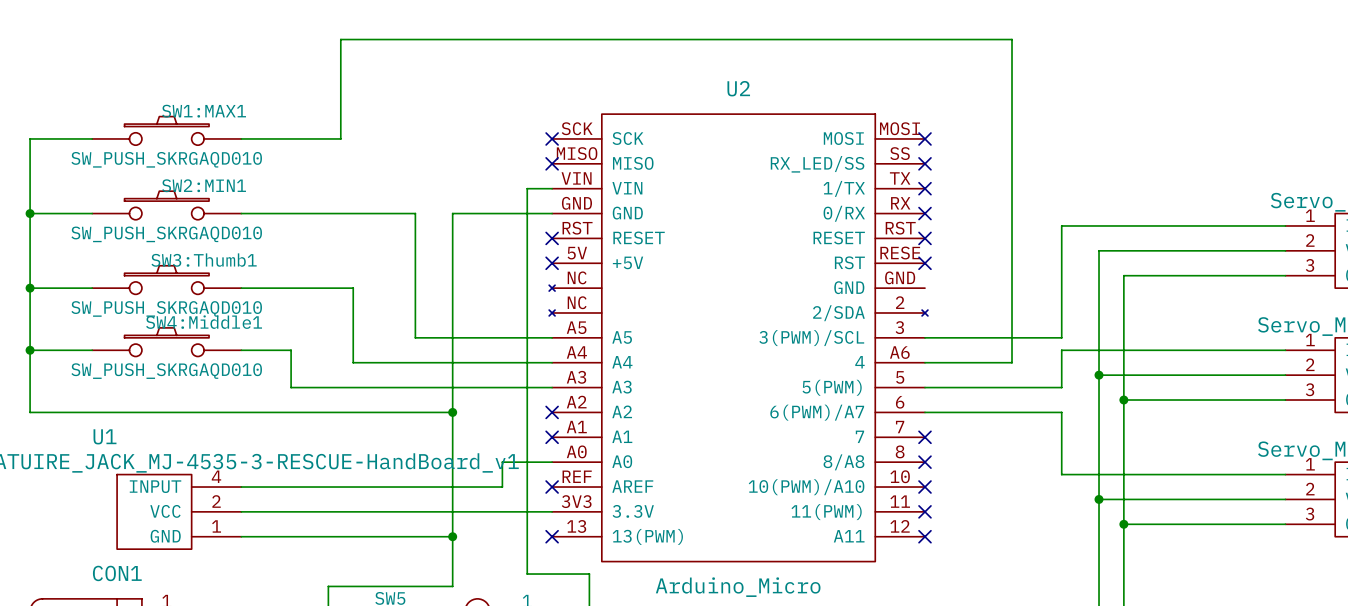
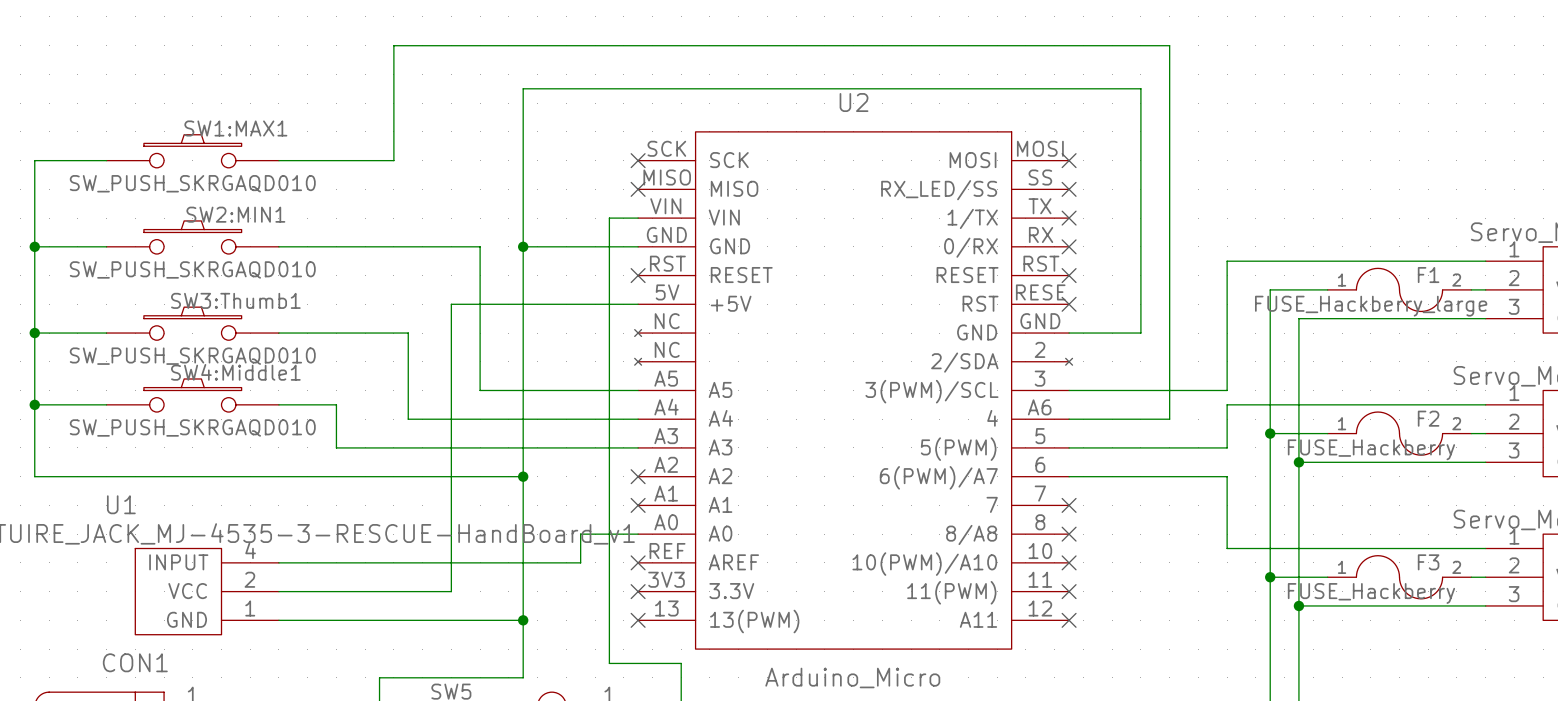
wire: none -> (523, 246) (523, 88) (1140, 88) (1140, 333) (1069, 333)
junction: none -> (523, 246)
wire: (1148, 250) (1273, 250) -> none
F1: none -> FUSE_Hackberry_large (1399, 289)
no-connect mark: (552, 263) -> none
wire: (1148, 375) (1273, 375) -> none
F2: none -> FUSE_Hackberry (1399, 433)
wire: (1148, 499) (1273, 499) -> none
F3: none -> FUSE_Hackberry (1399, 577)
wire: (390, 511) (552, 511) -> (451, 591) (451, 304) (638, 304)
no-connect mark: none -> (638, 591)

